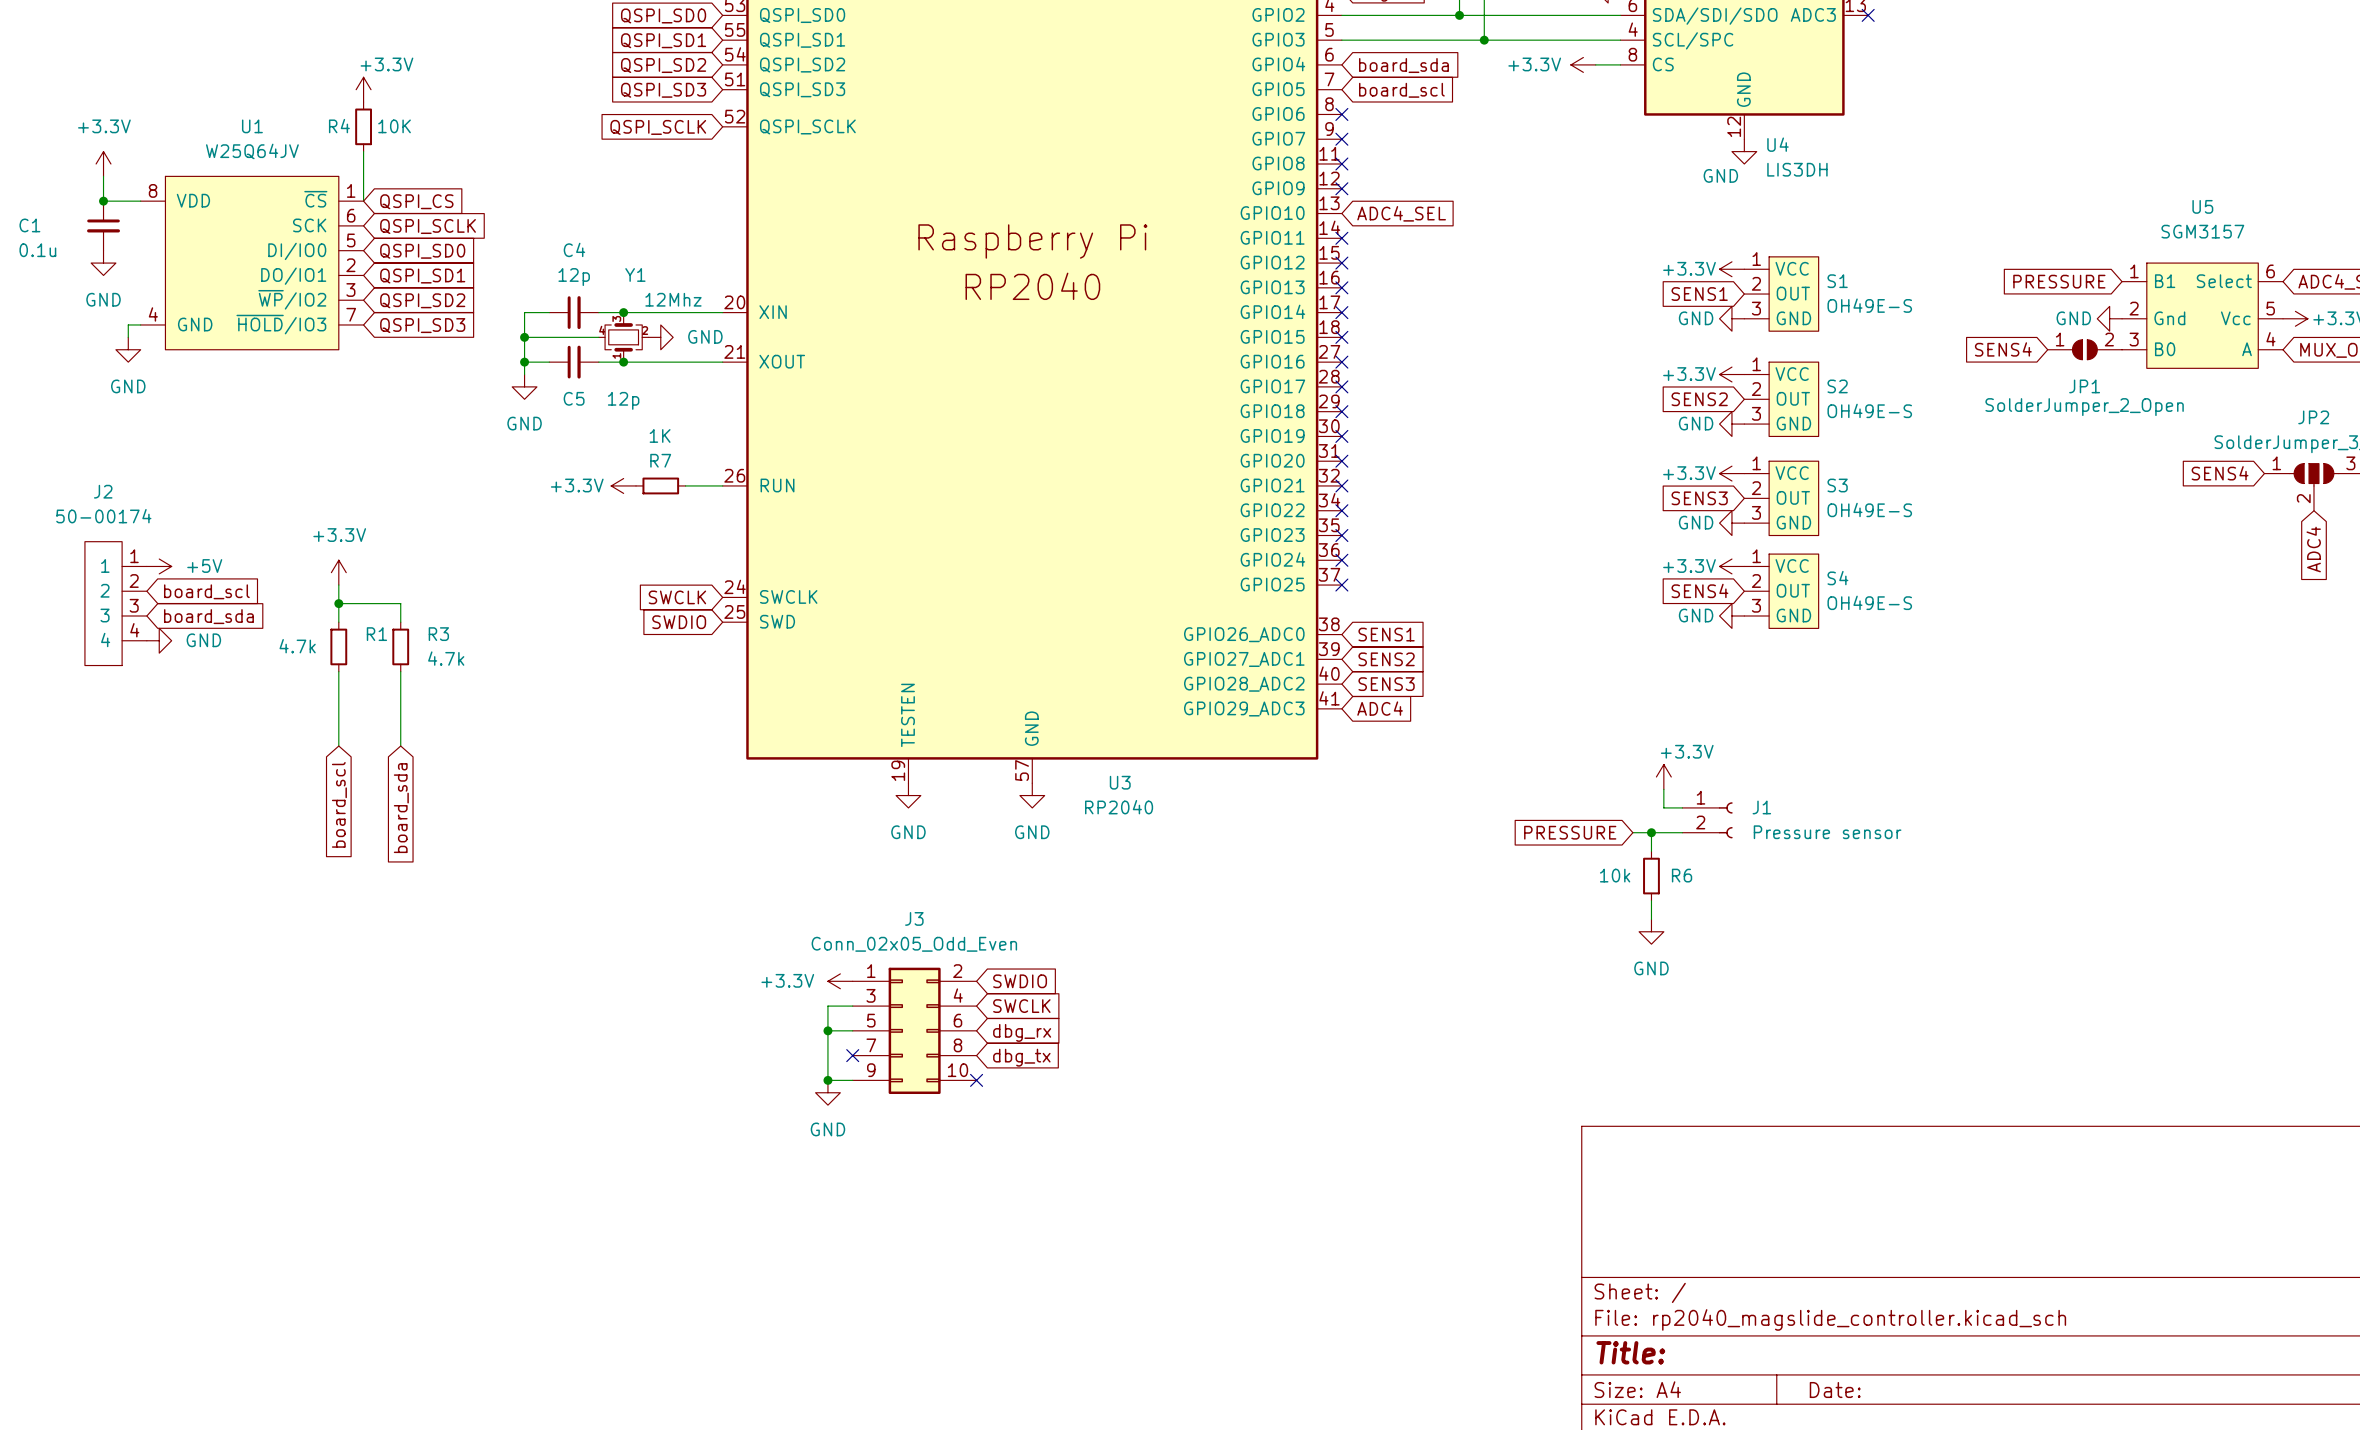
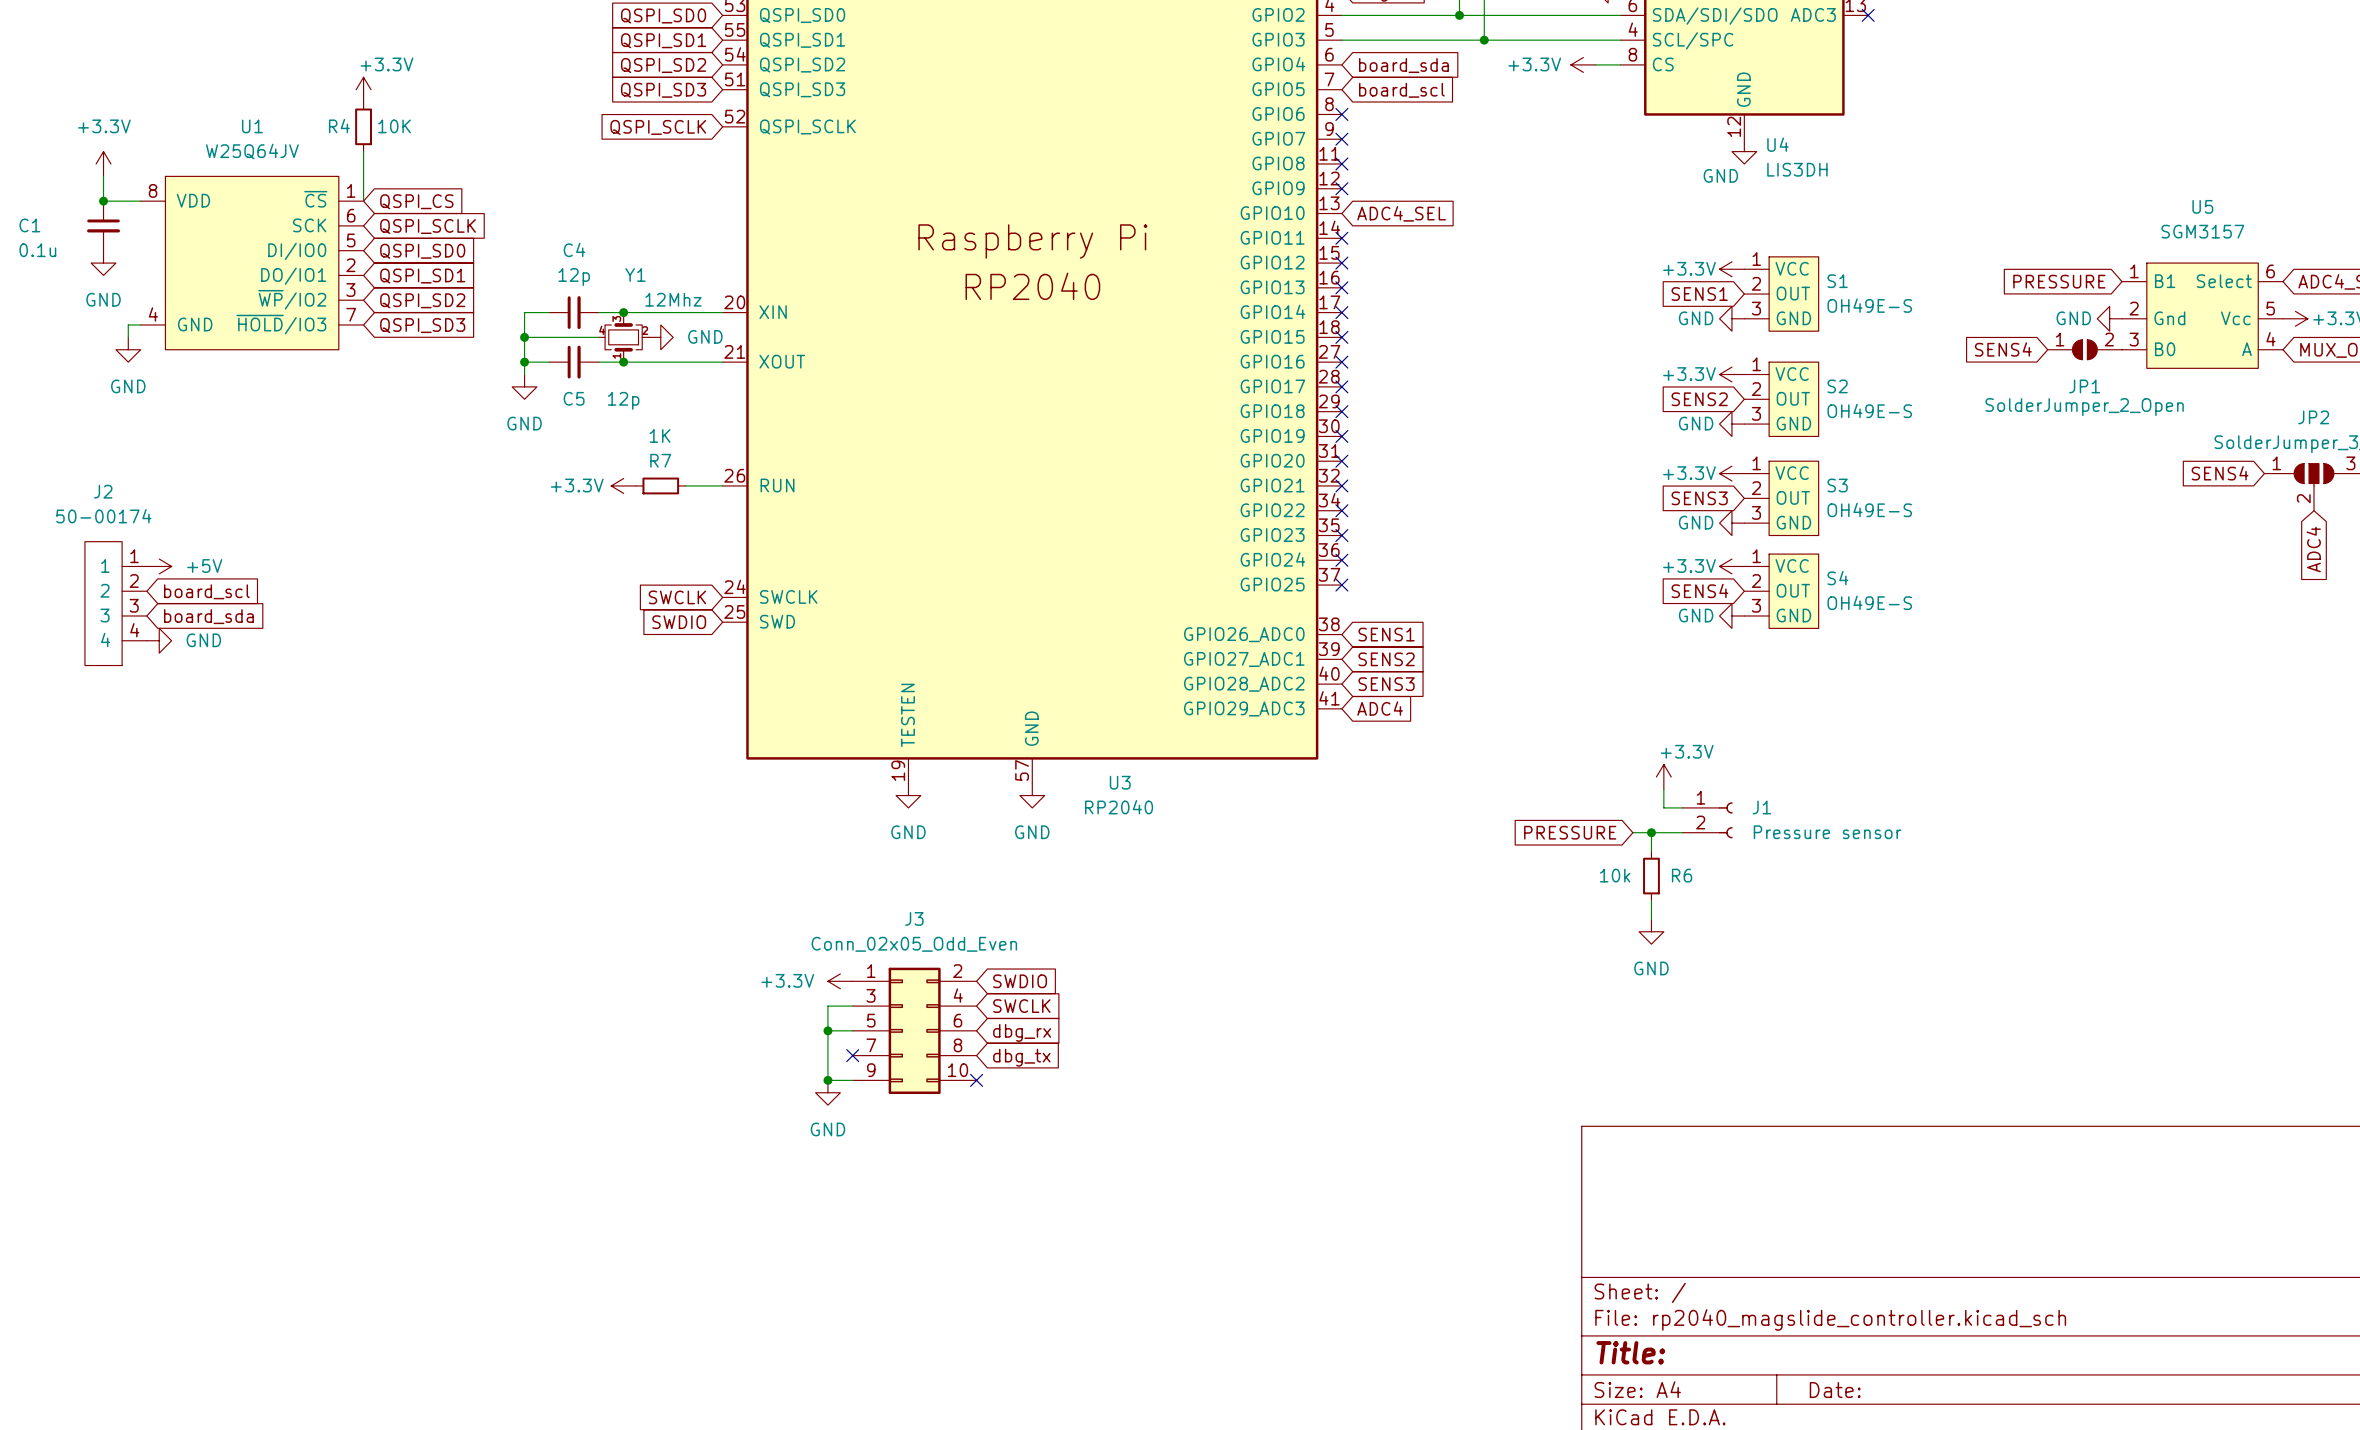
power symbol: +3.3V (338, 572) -> none
wire: (338, 585) (338, 622) -> none
wire: (338, 603) (400, 603) (400, 622) -> none
junction: (338, 603) -> none
R1: 4.7k (338, 646) -> none
R3: 4.7k (400, 646) -> none
wire: (338, 671) (338, 746) -> none
wire: (400, 671) (400, 746) -> none
global label: board_scl (339, 804) -> none
global label: board_sda (401, 808) -> none

